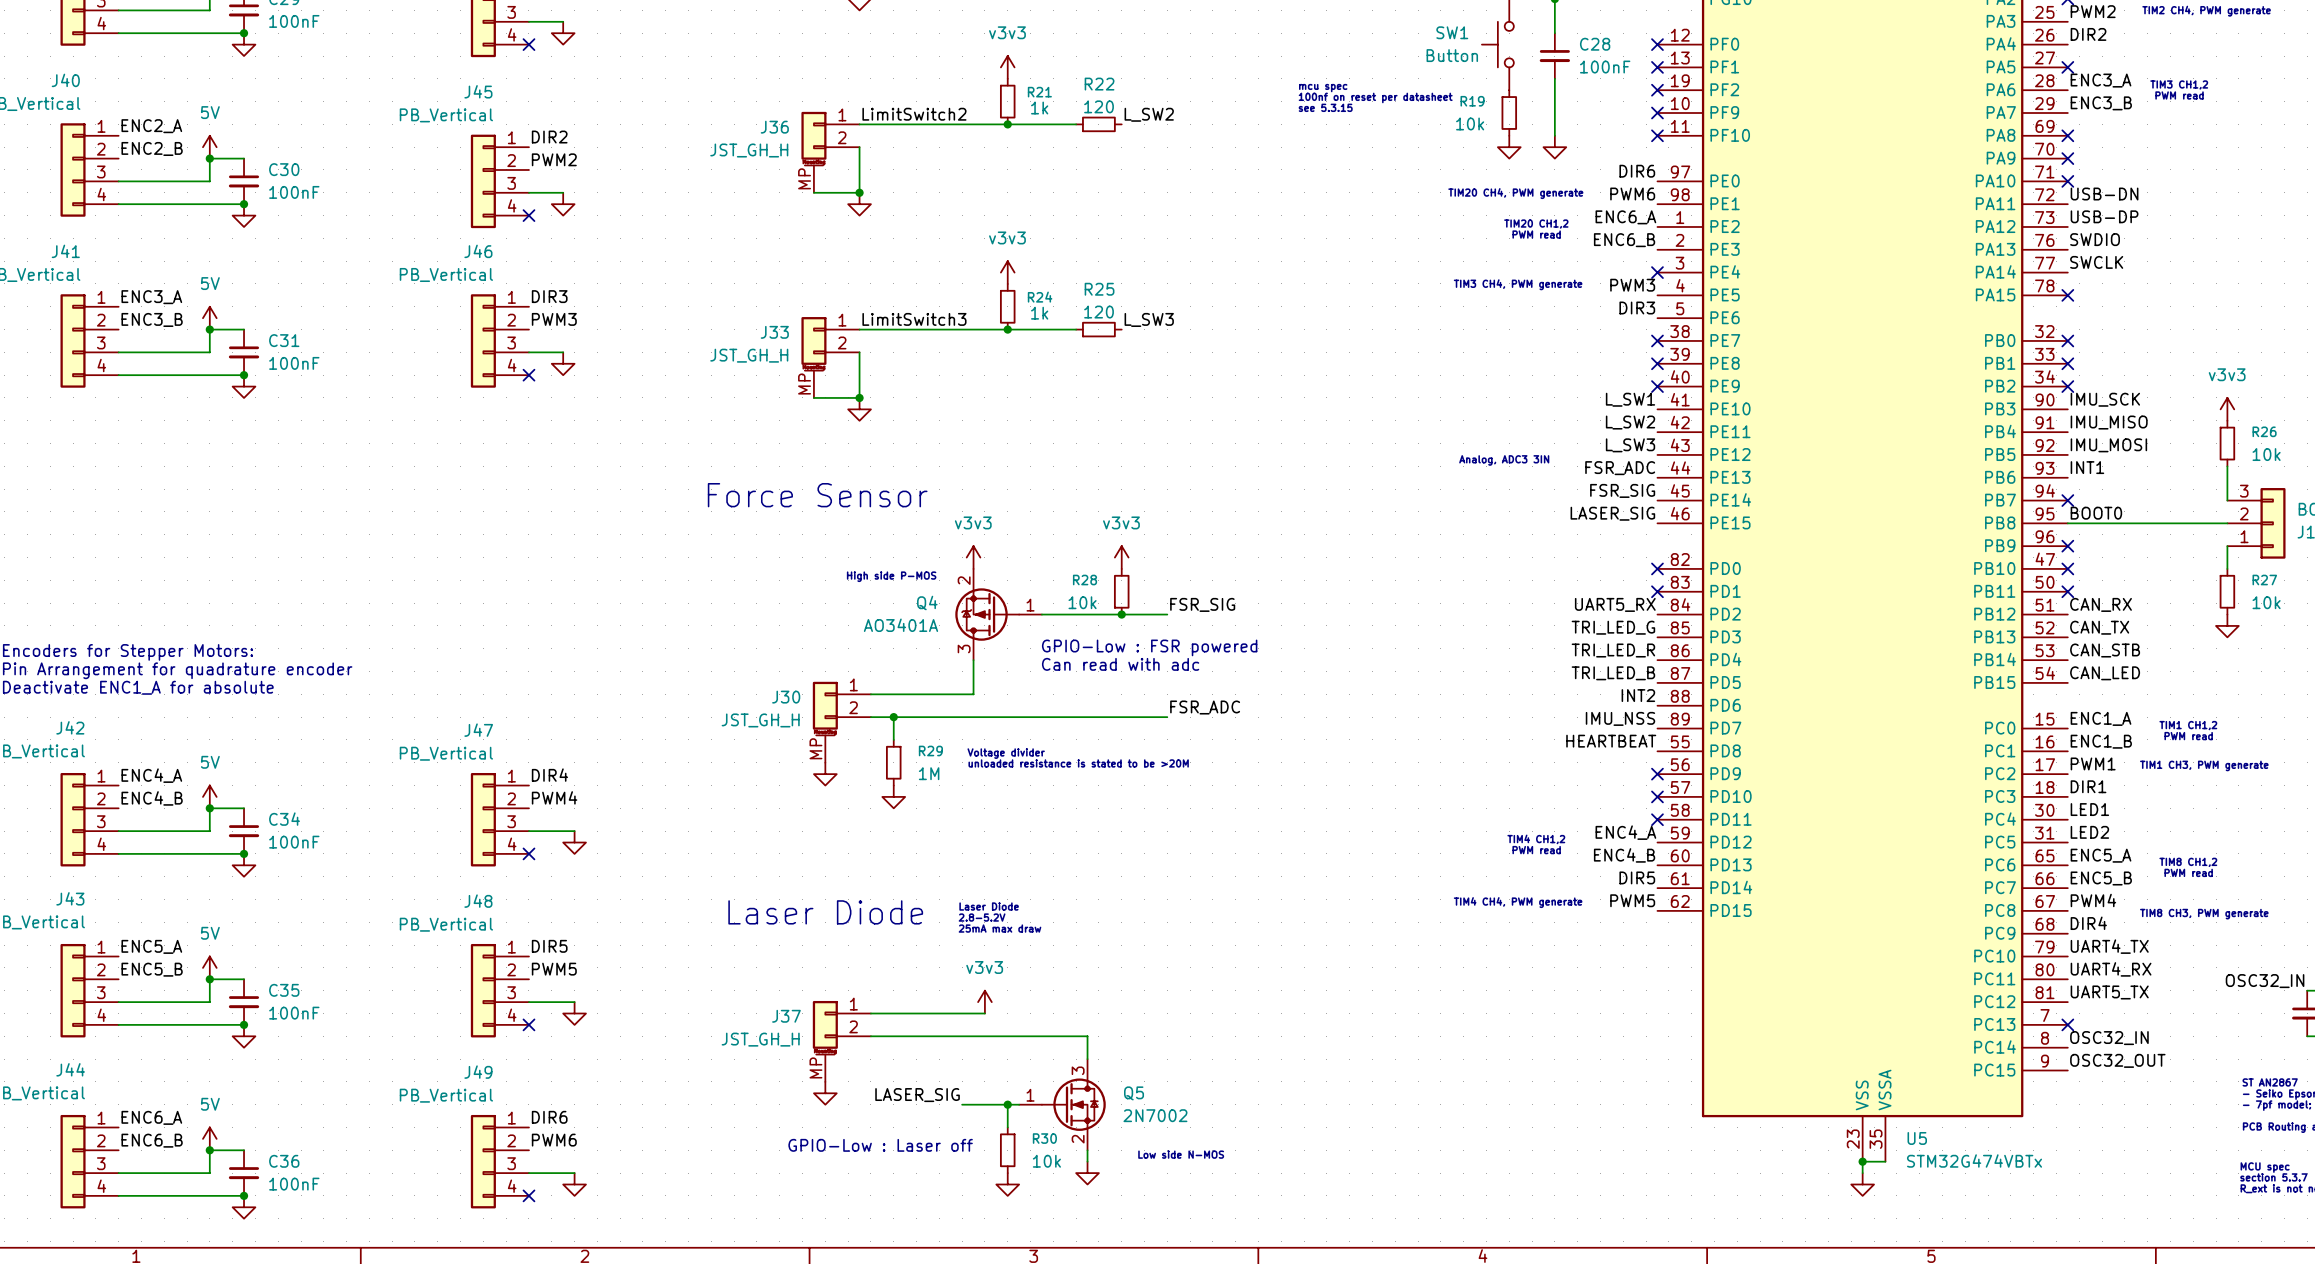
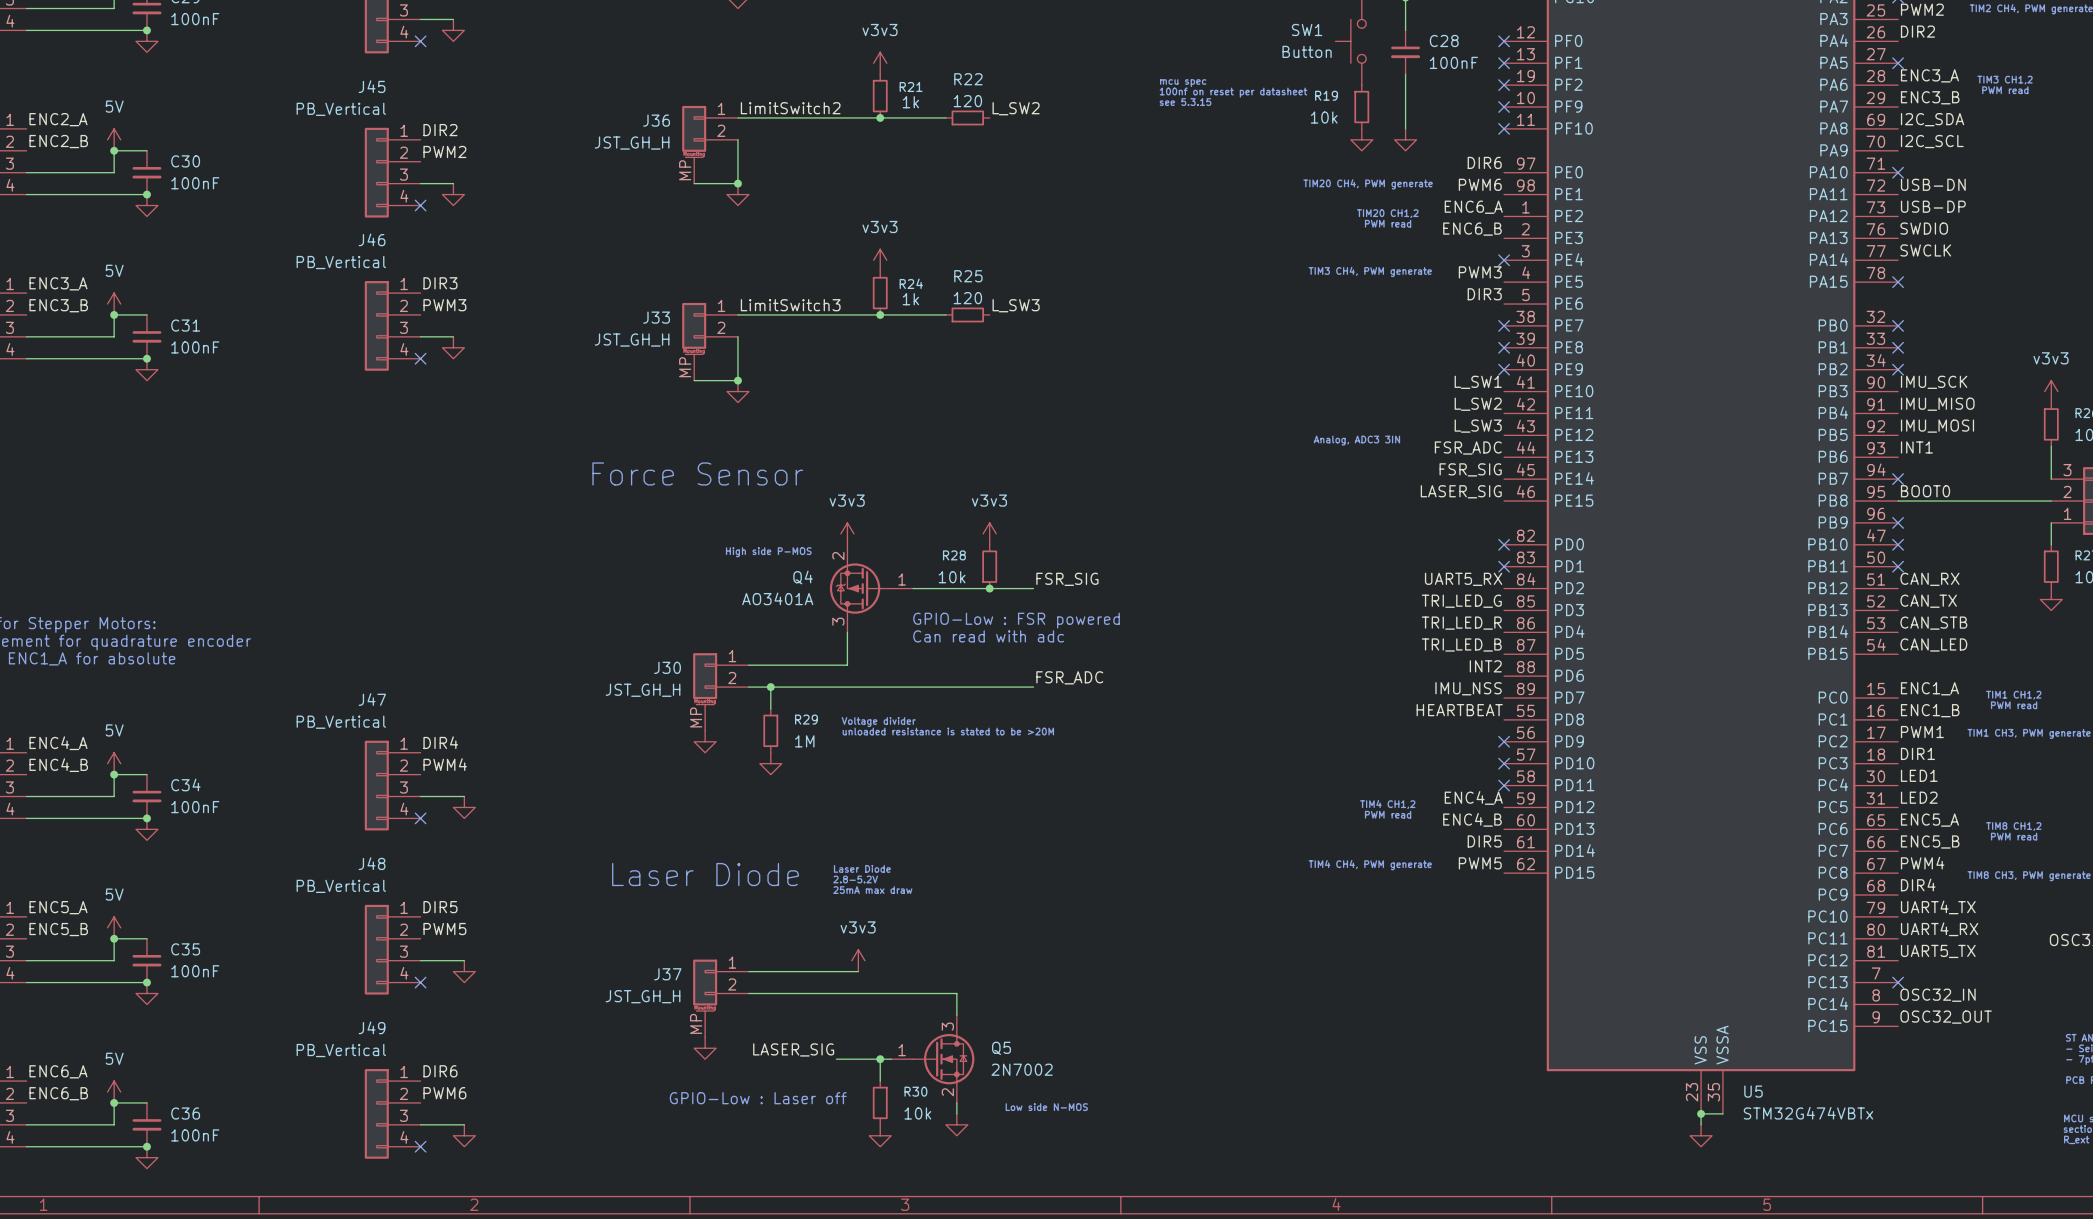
label: none -> I2C_SDA (1932, 119)
no-connect mark: (2067, 135) -> none
label: none -> I2C_SCL (1932, 141)
no-connect mark: (2067, 158) -> none

